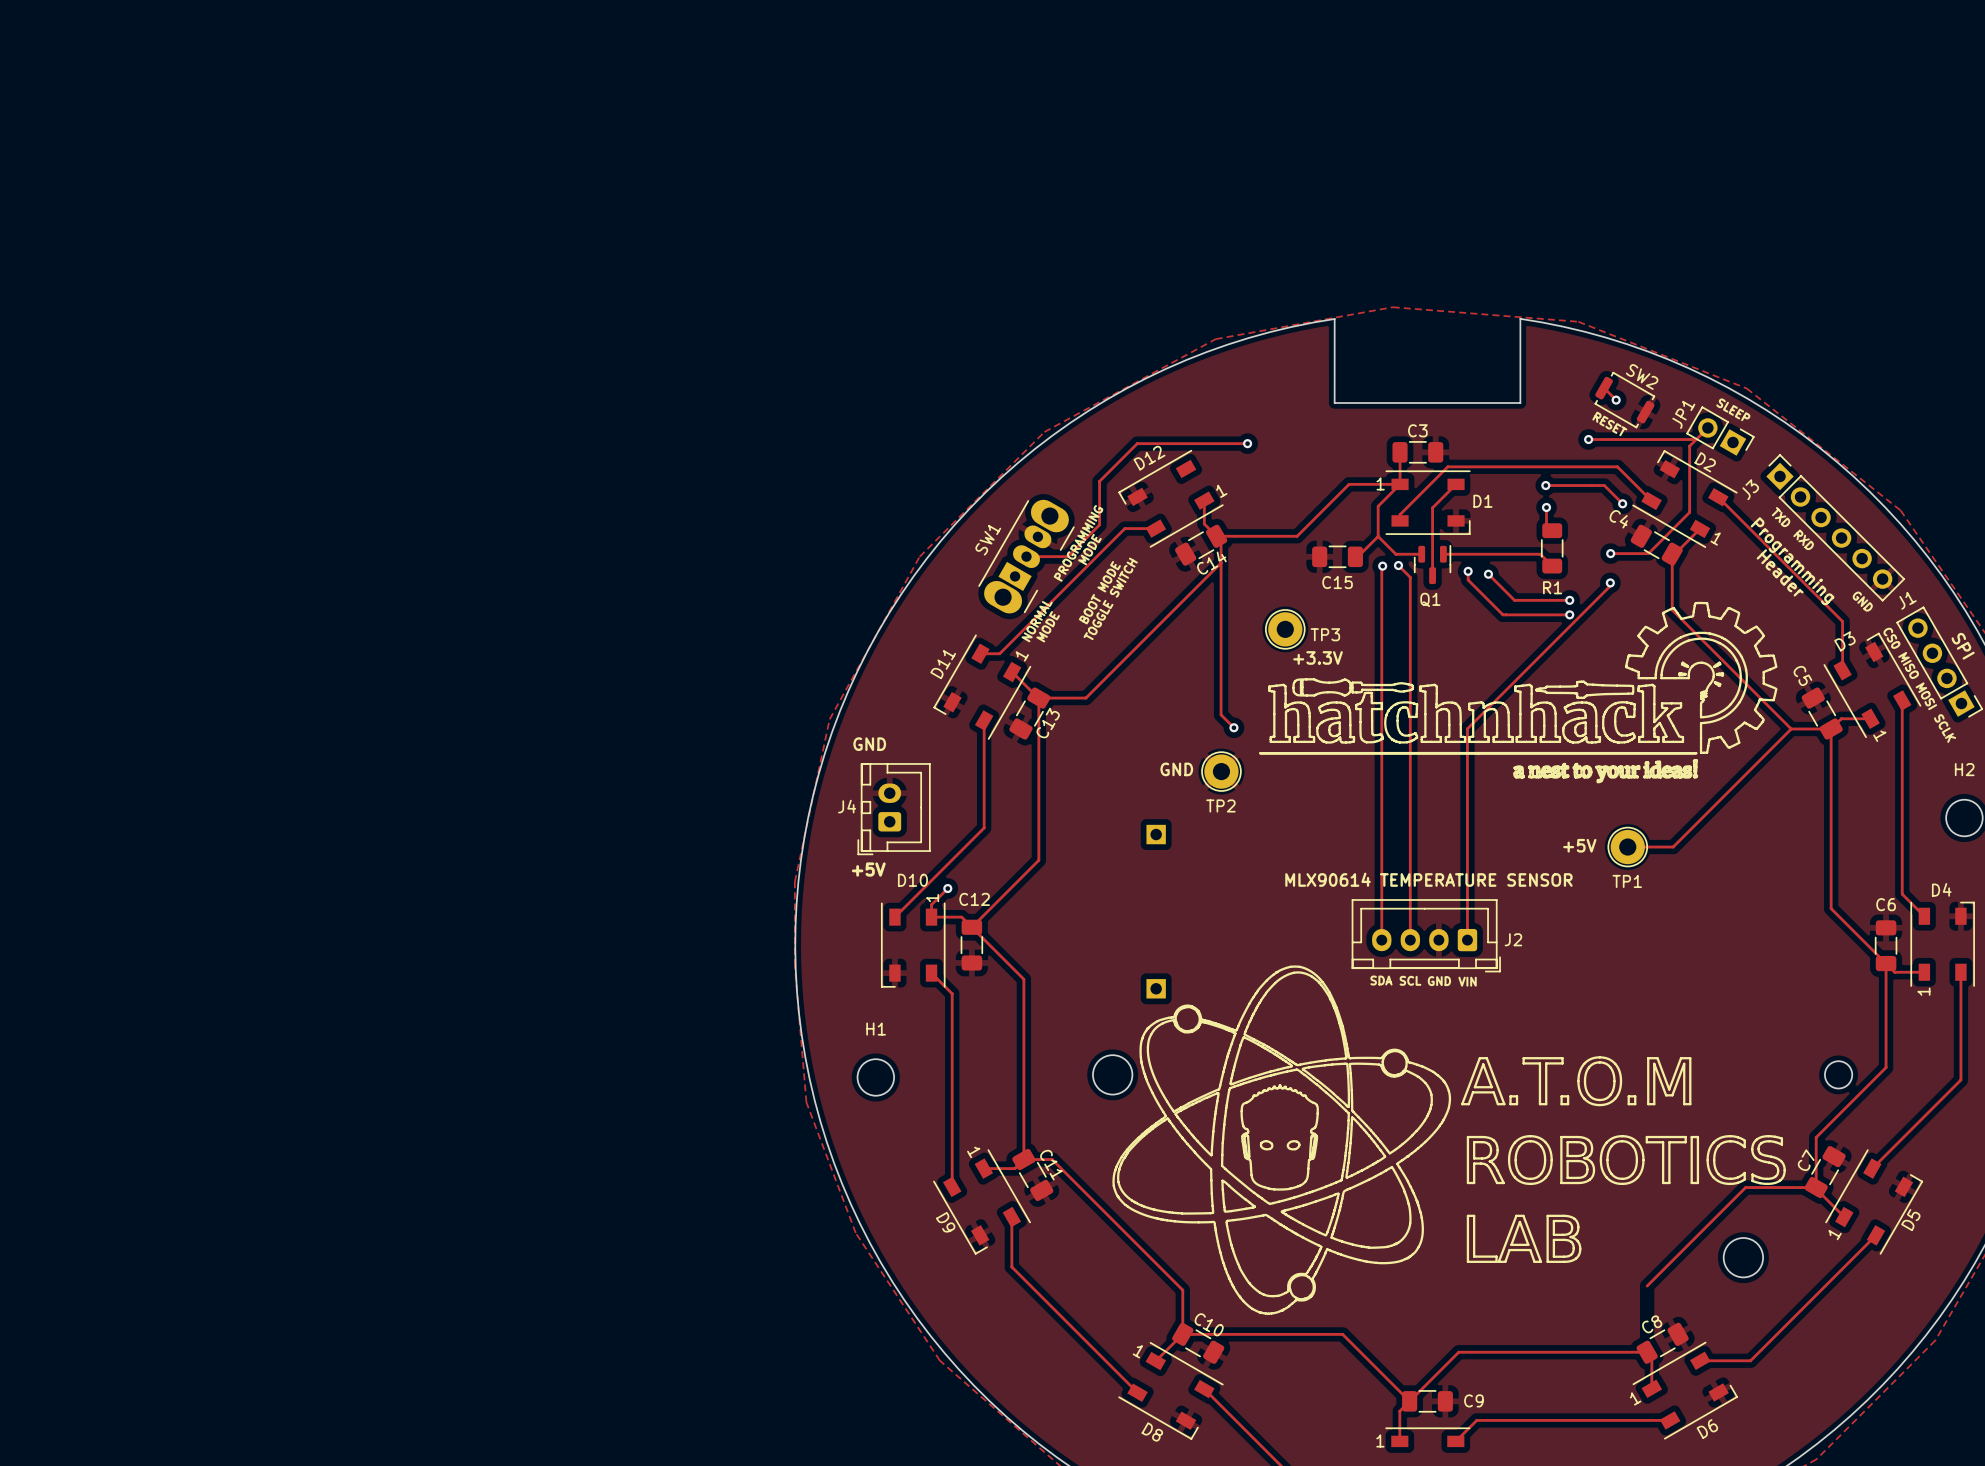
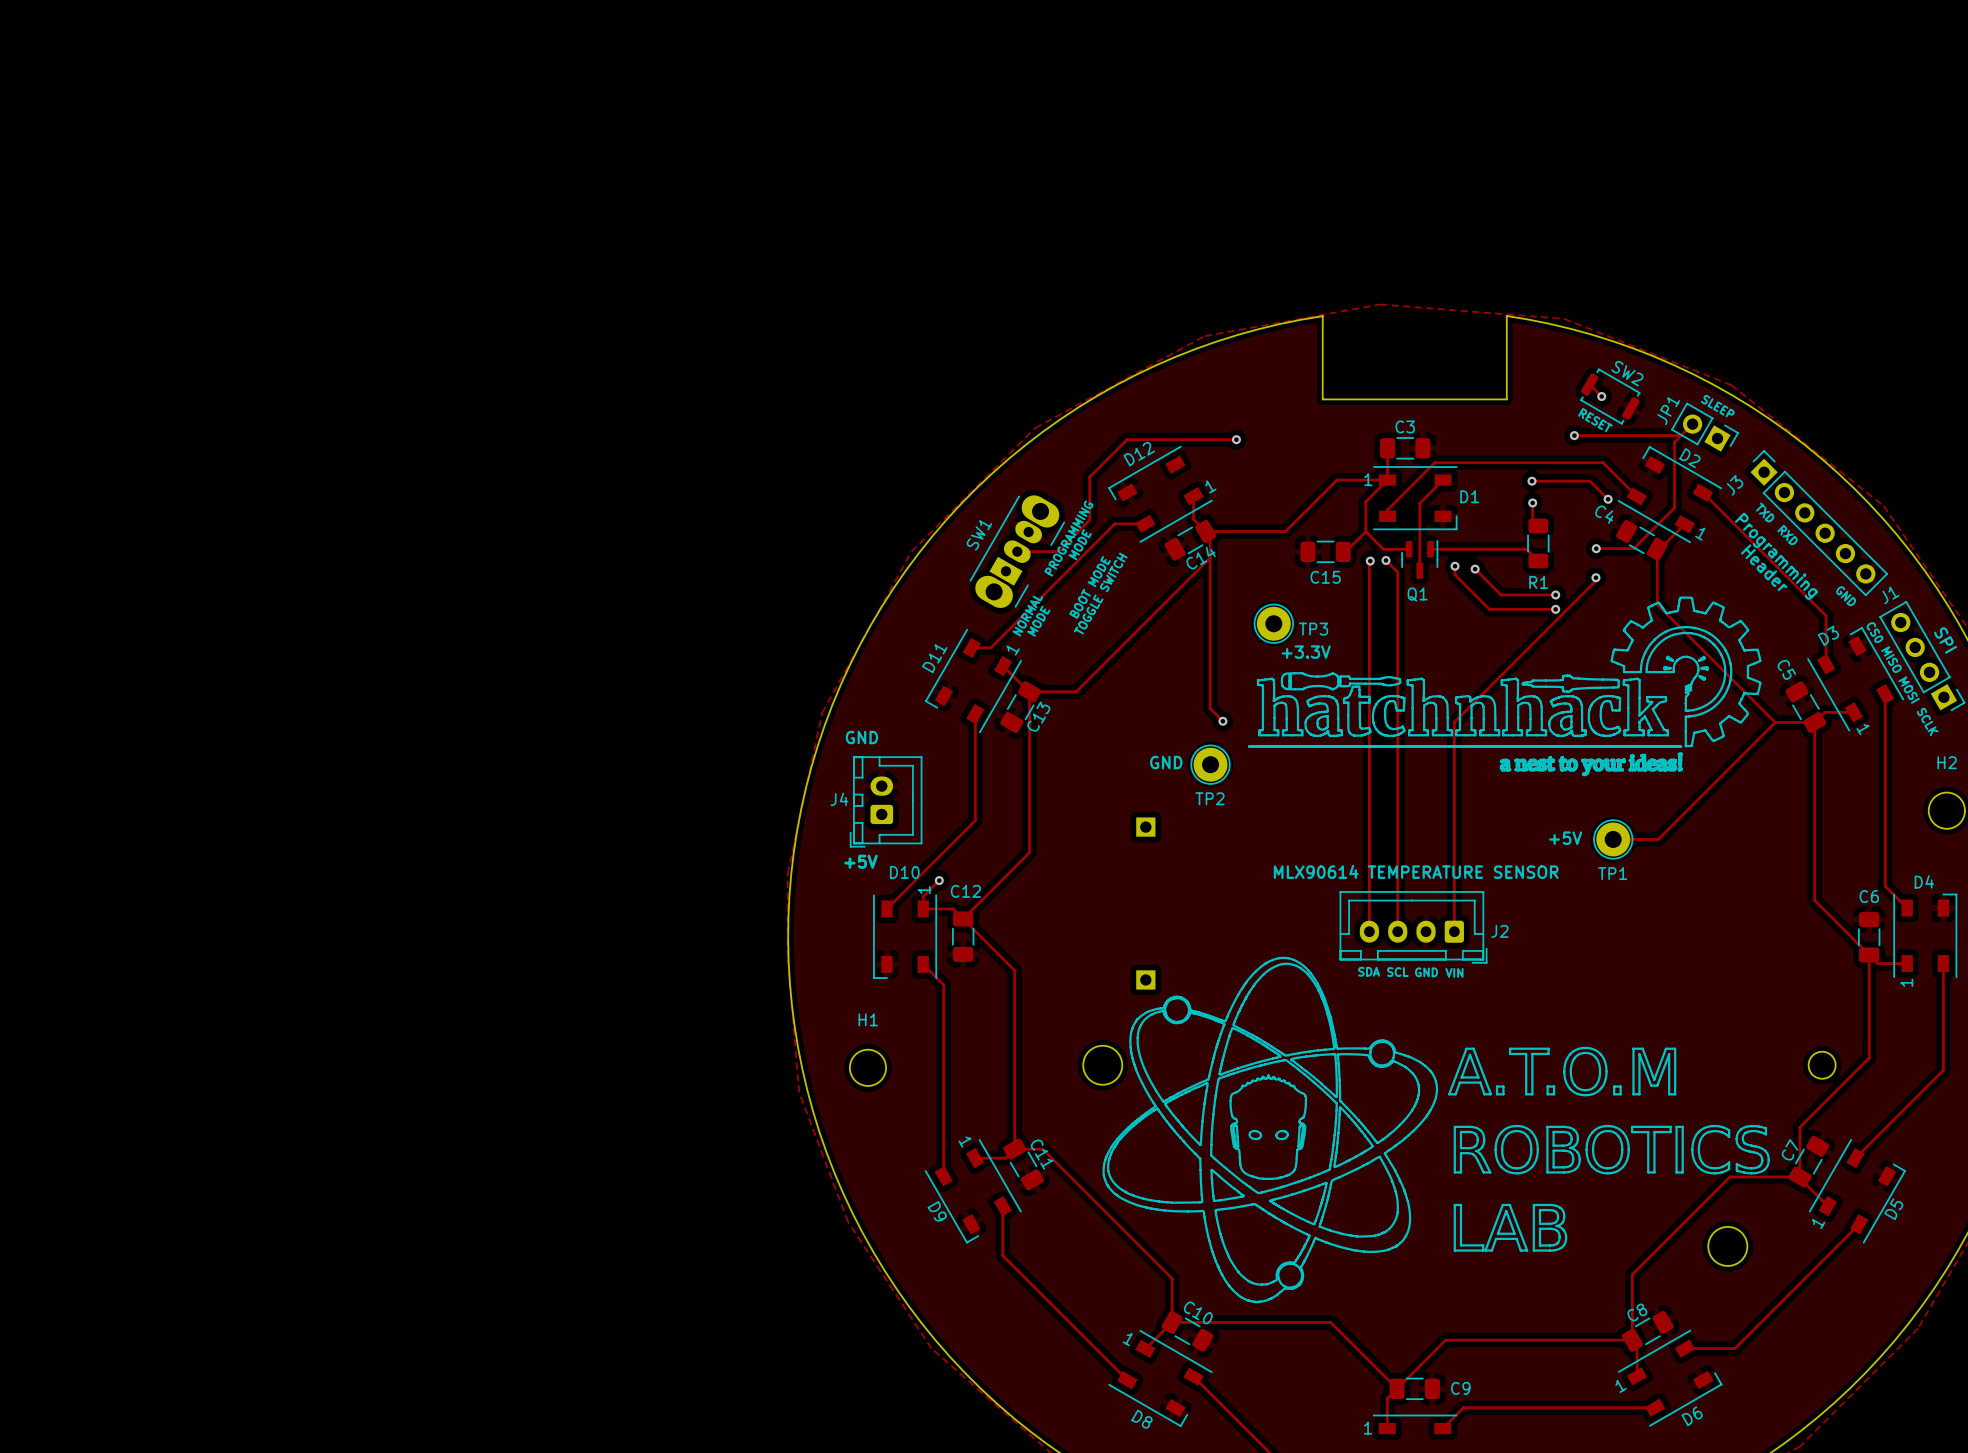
track: none -> (1632, 1274) (1632, 1340)

